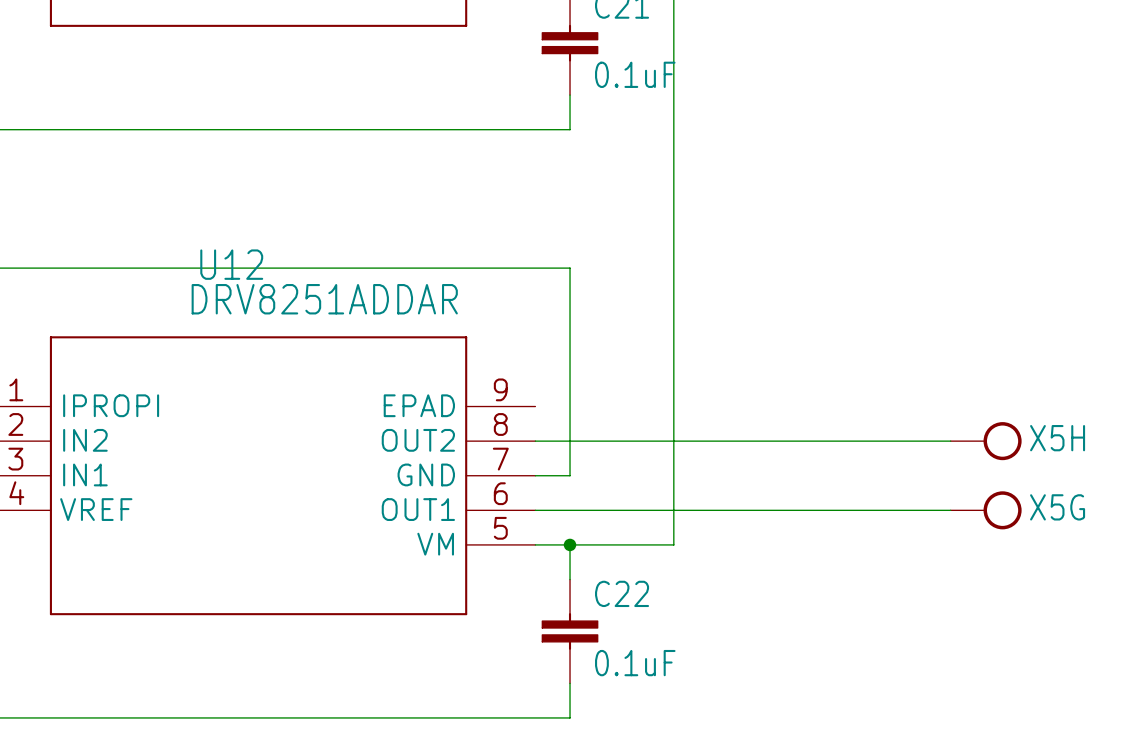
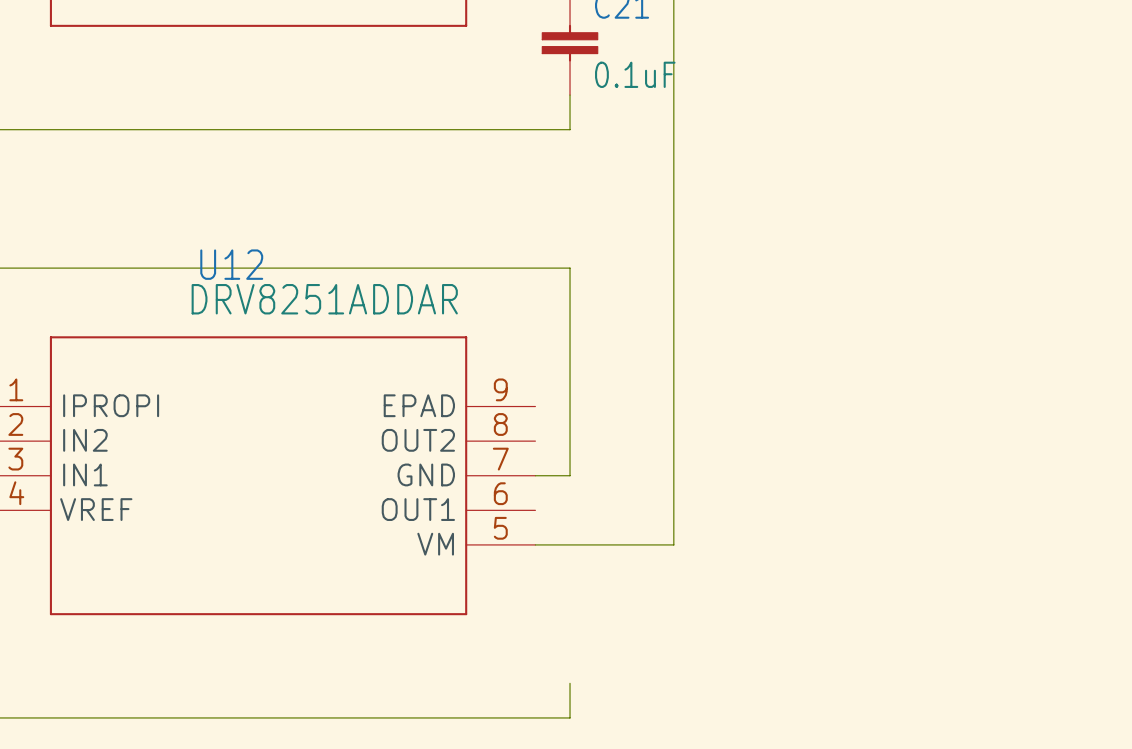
wire: (535, 441) (950, 441) -> none
X5H: (986, 441) -> none
wire: (535, 510) (950, 510) -> none
X5G: (986, 510) -> none
wire: (570, 544) (570, 579) -> none
junction: (570, 544) -> none
C22: 0.1uF (570, 631) -> none

